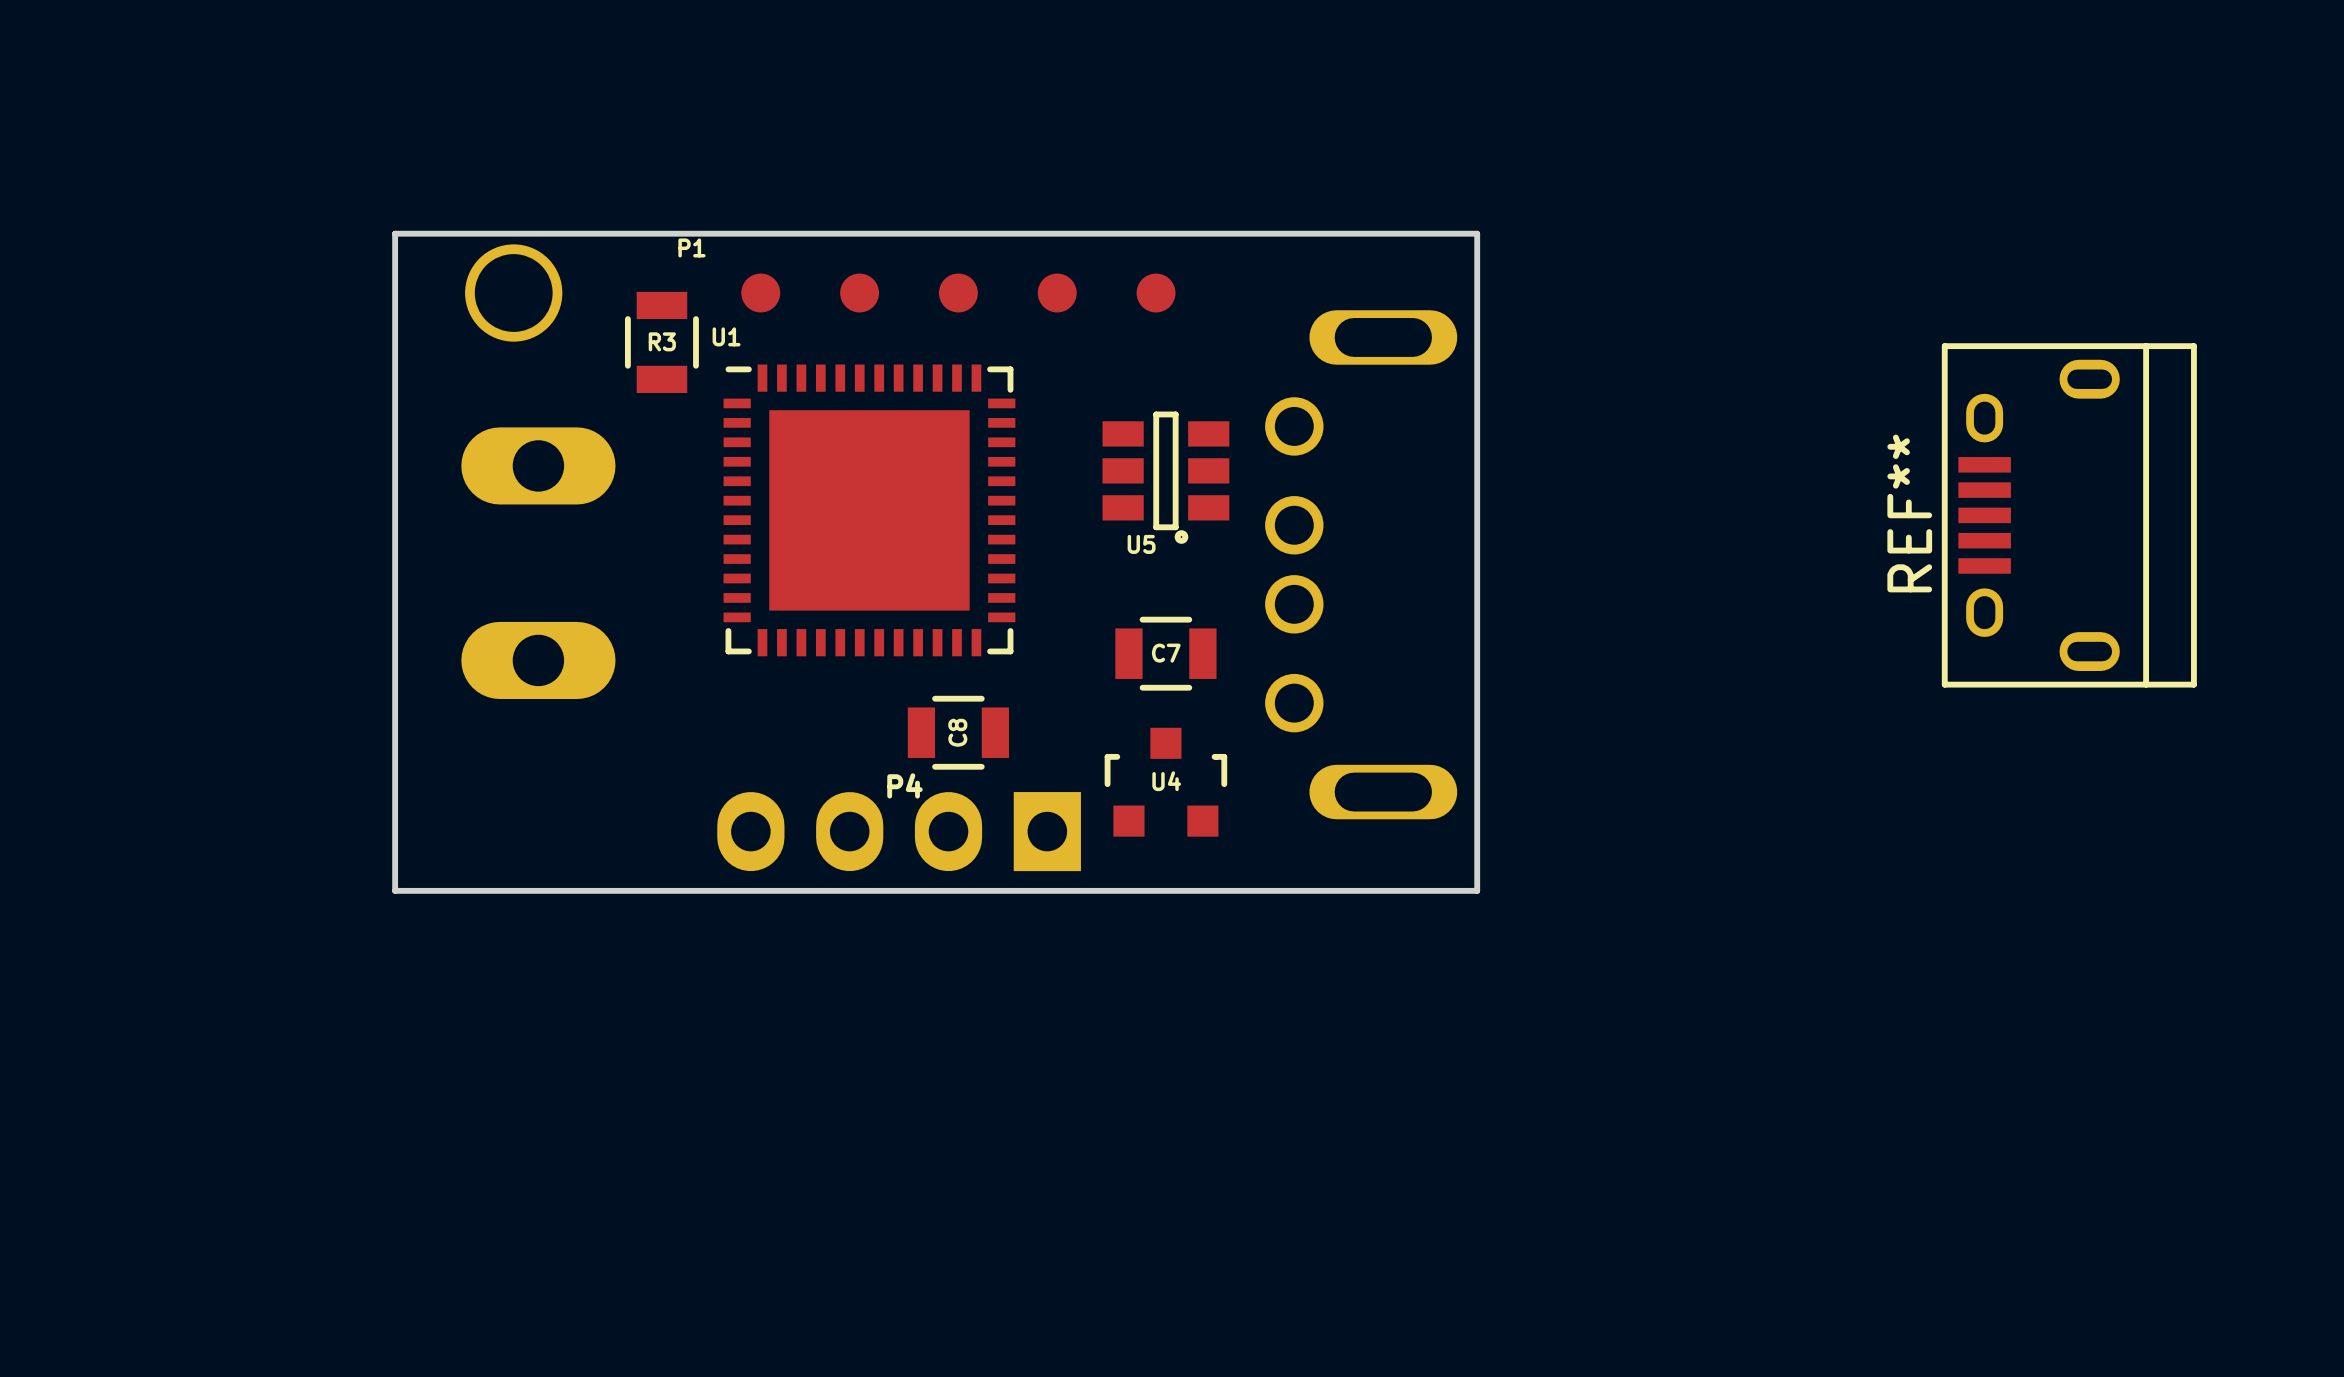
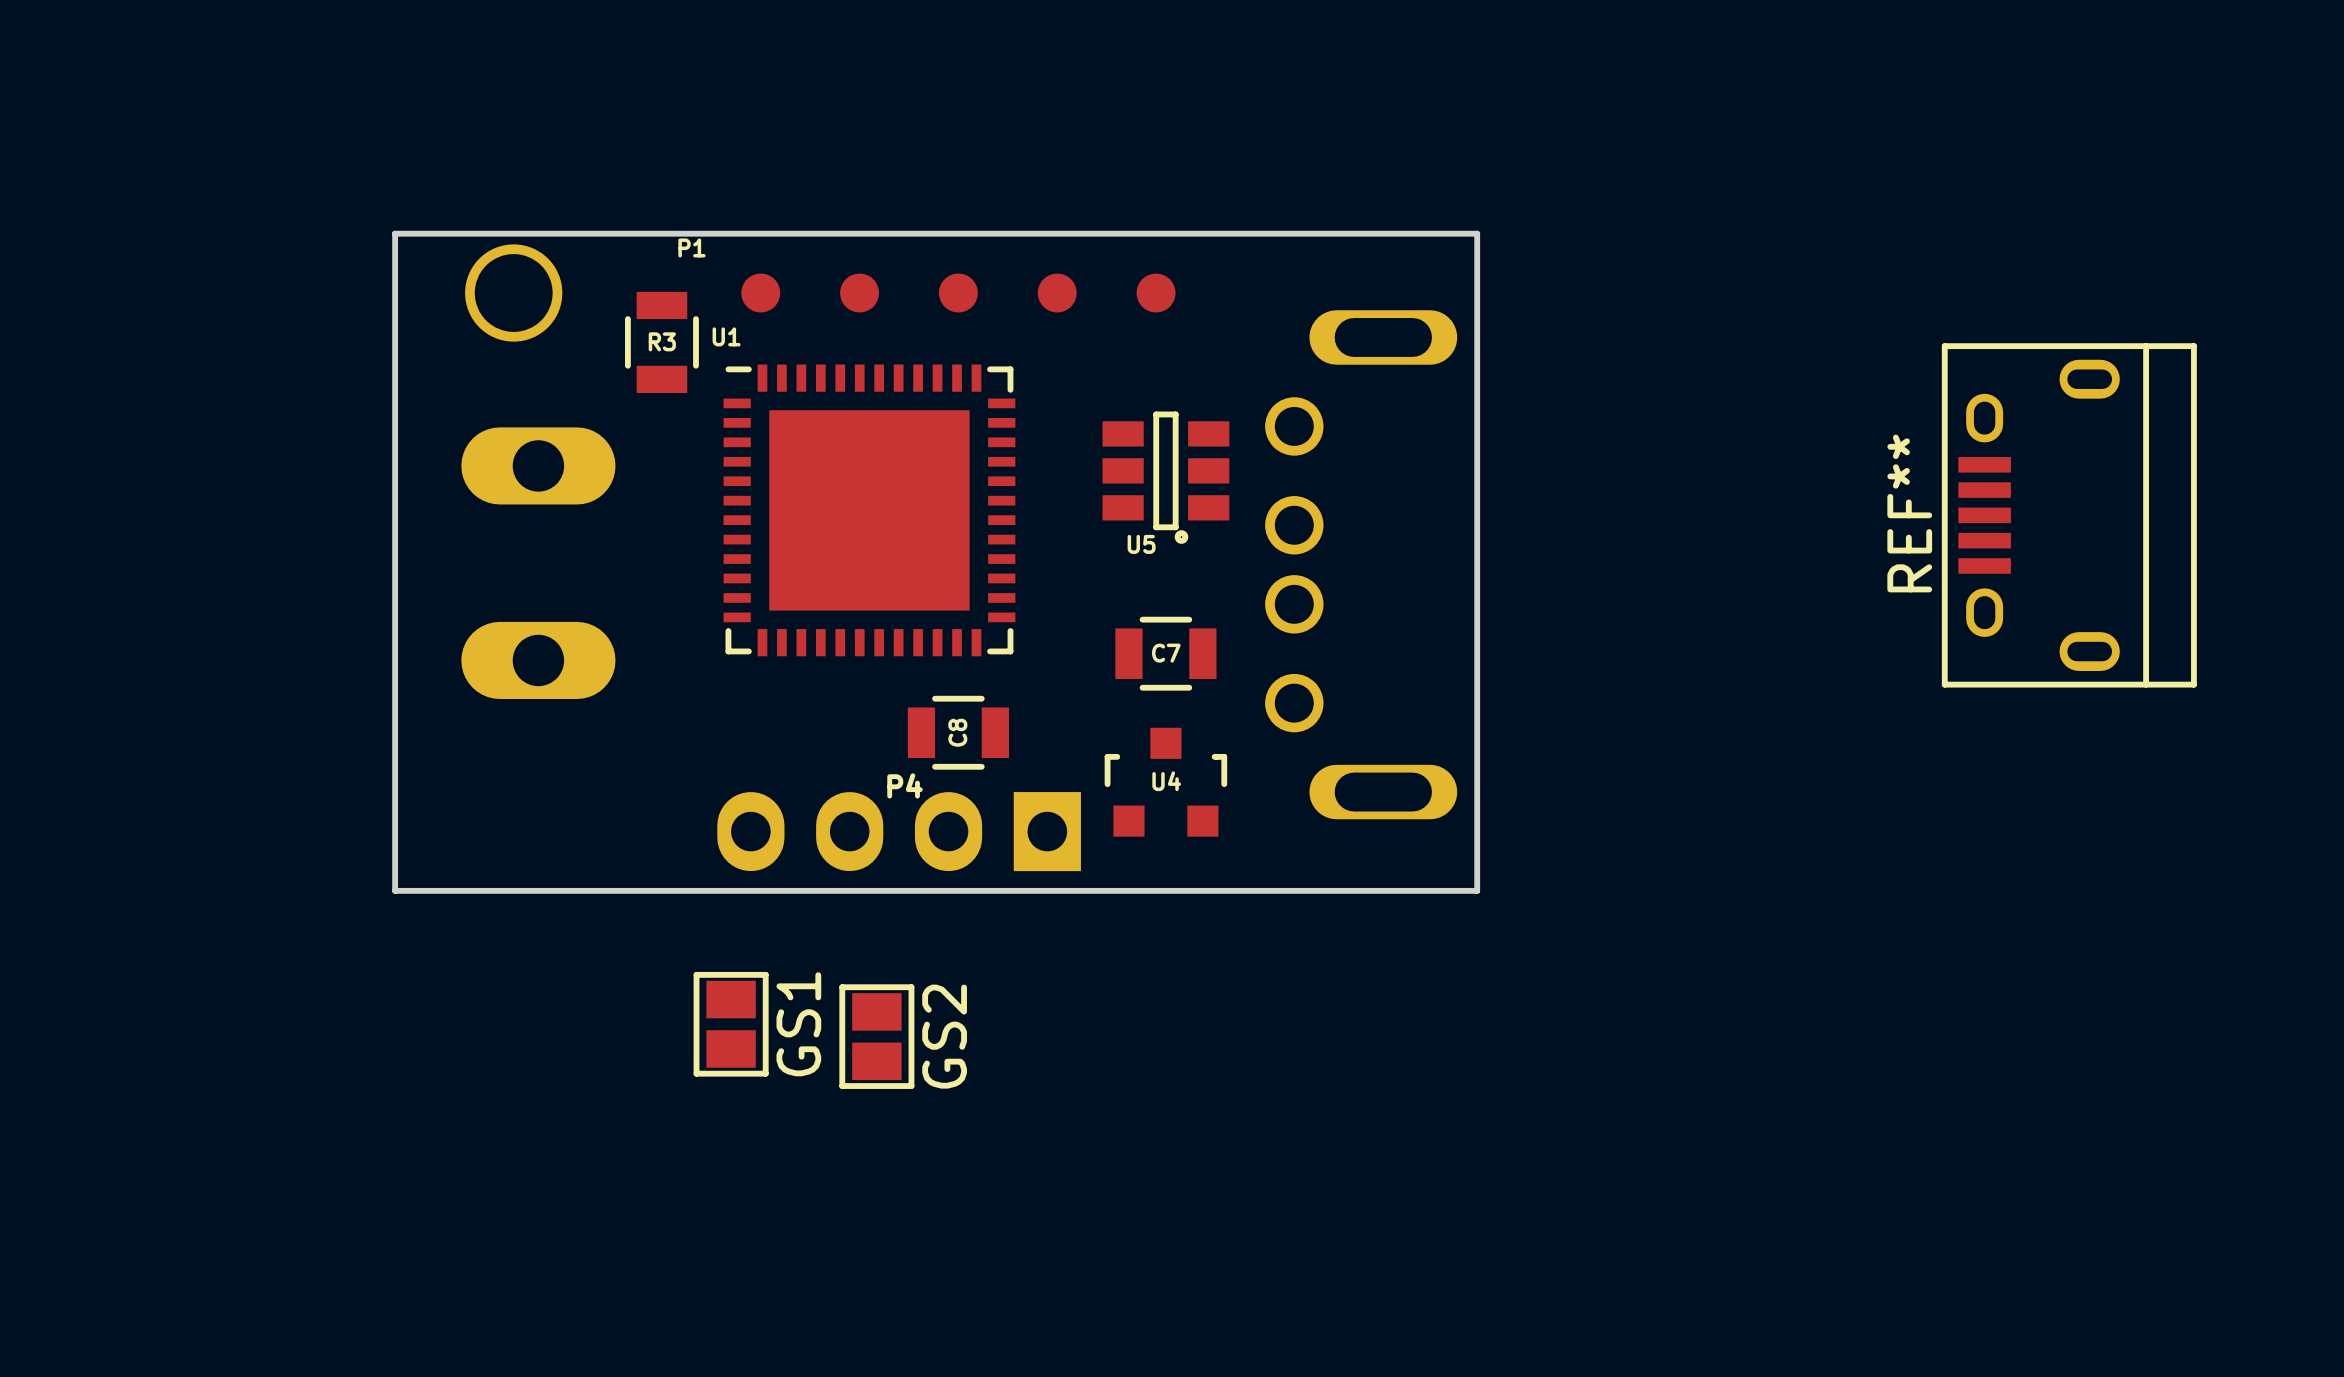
GS1: none -> (731, 1024)
GS2: none -> (876, 1036)

